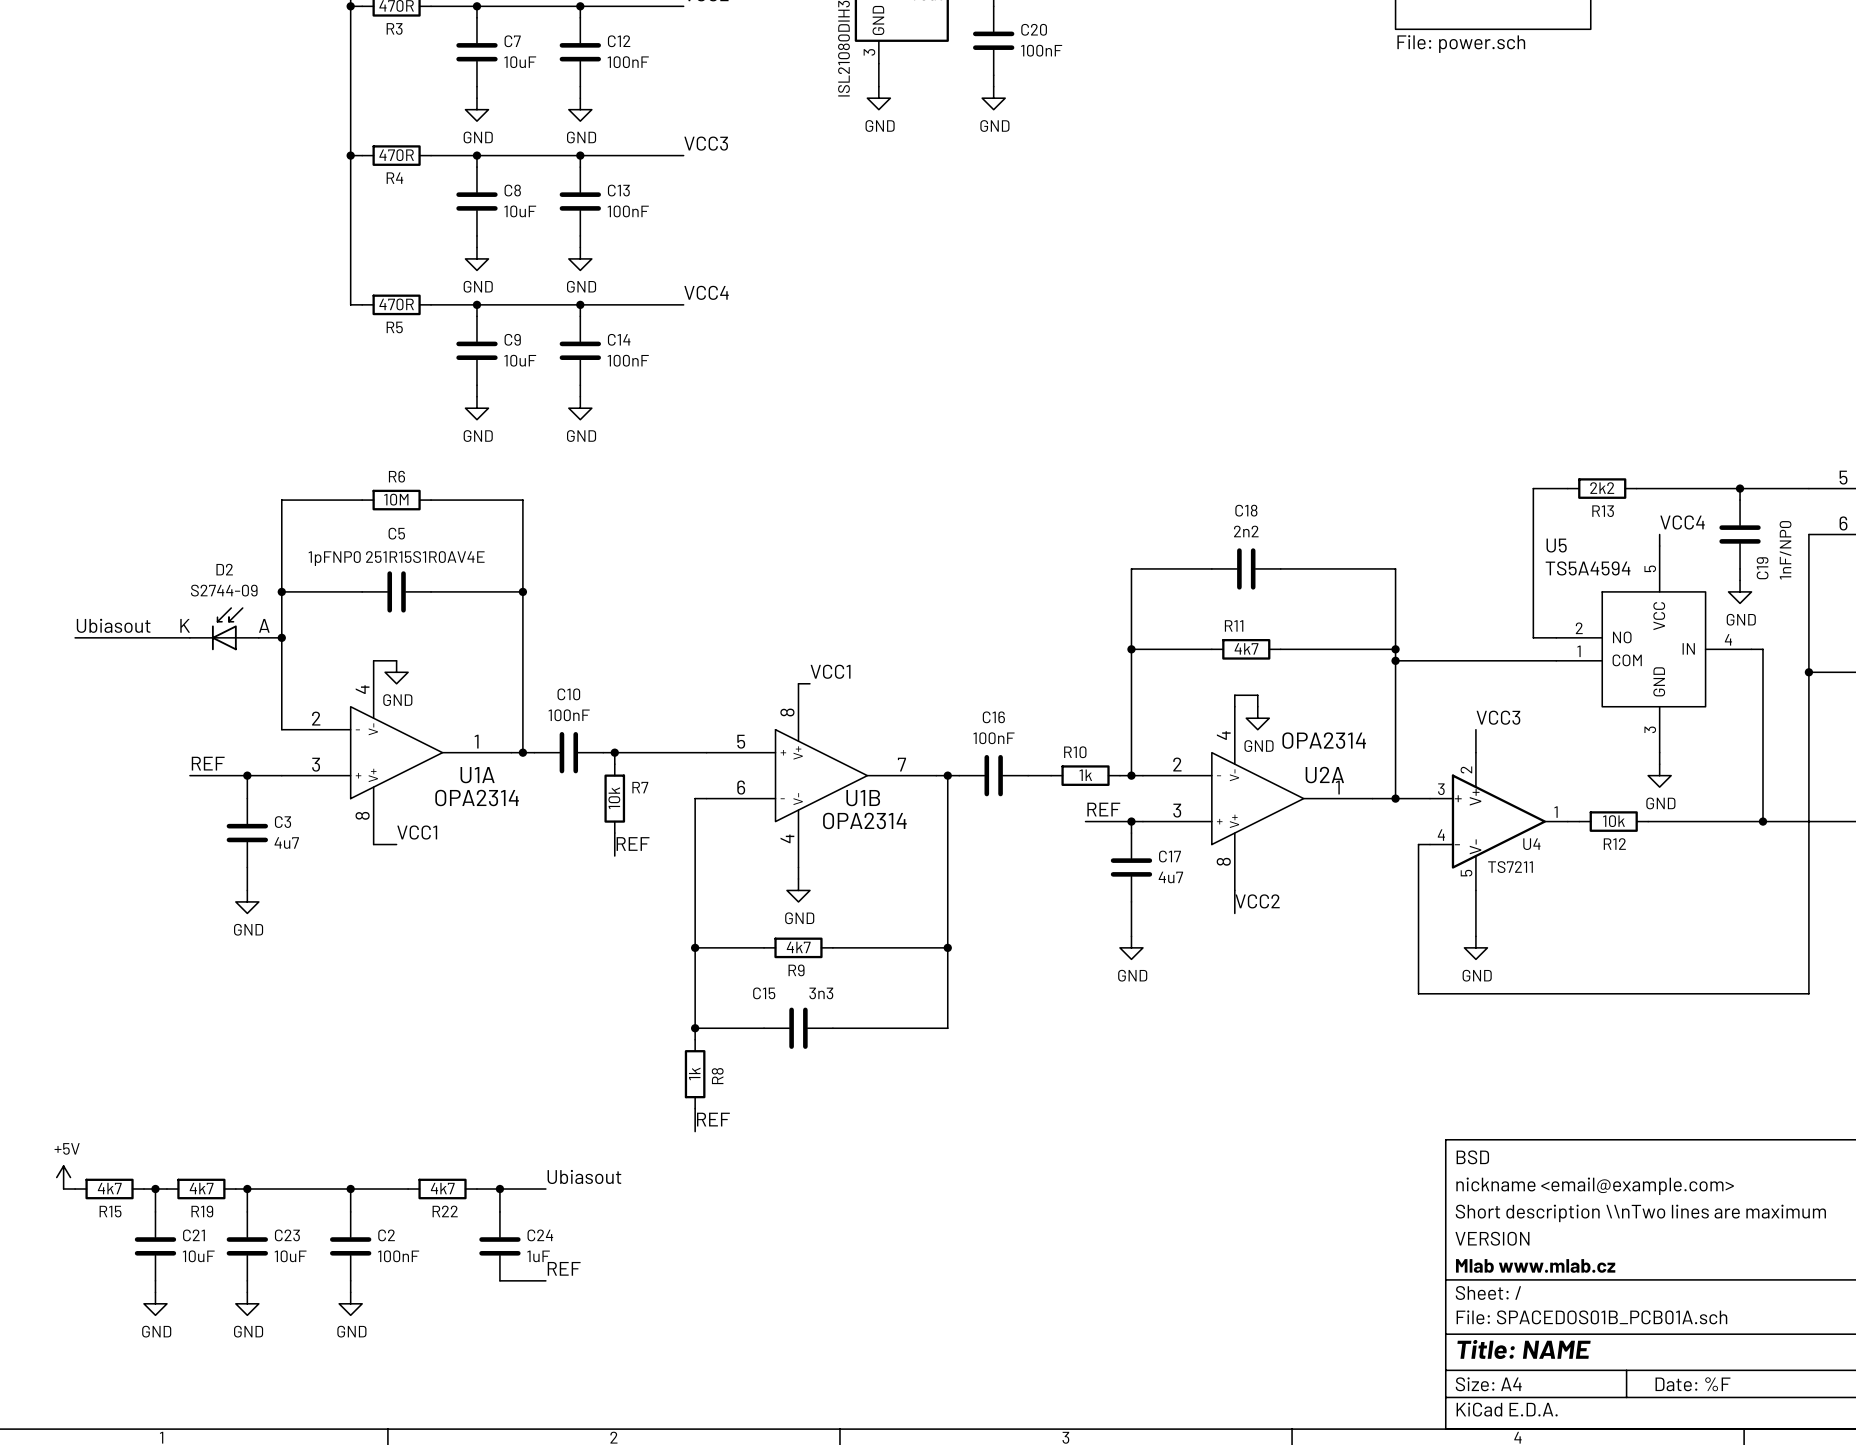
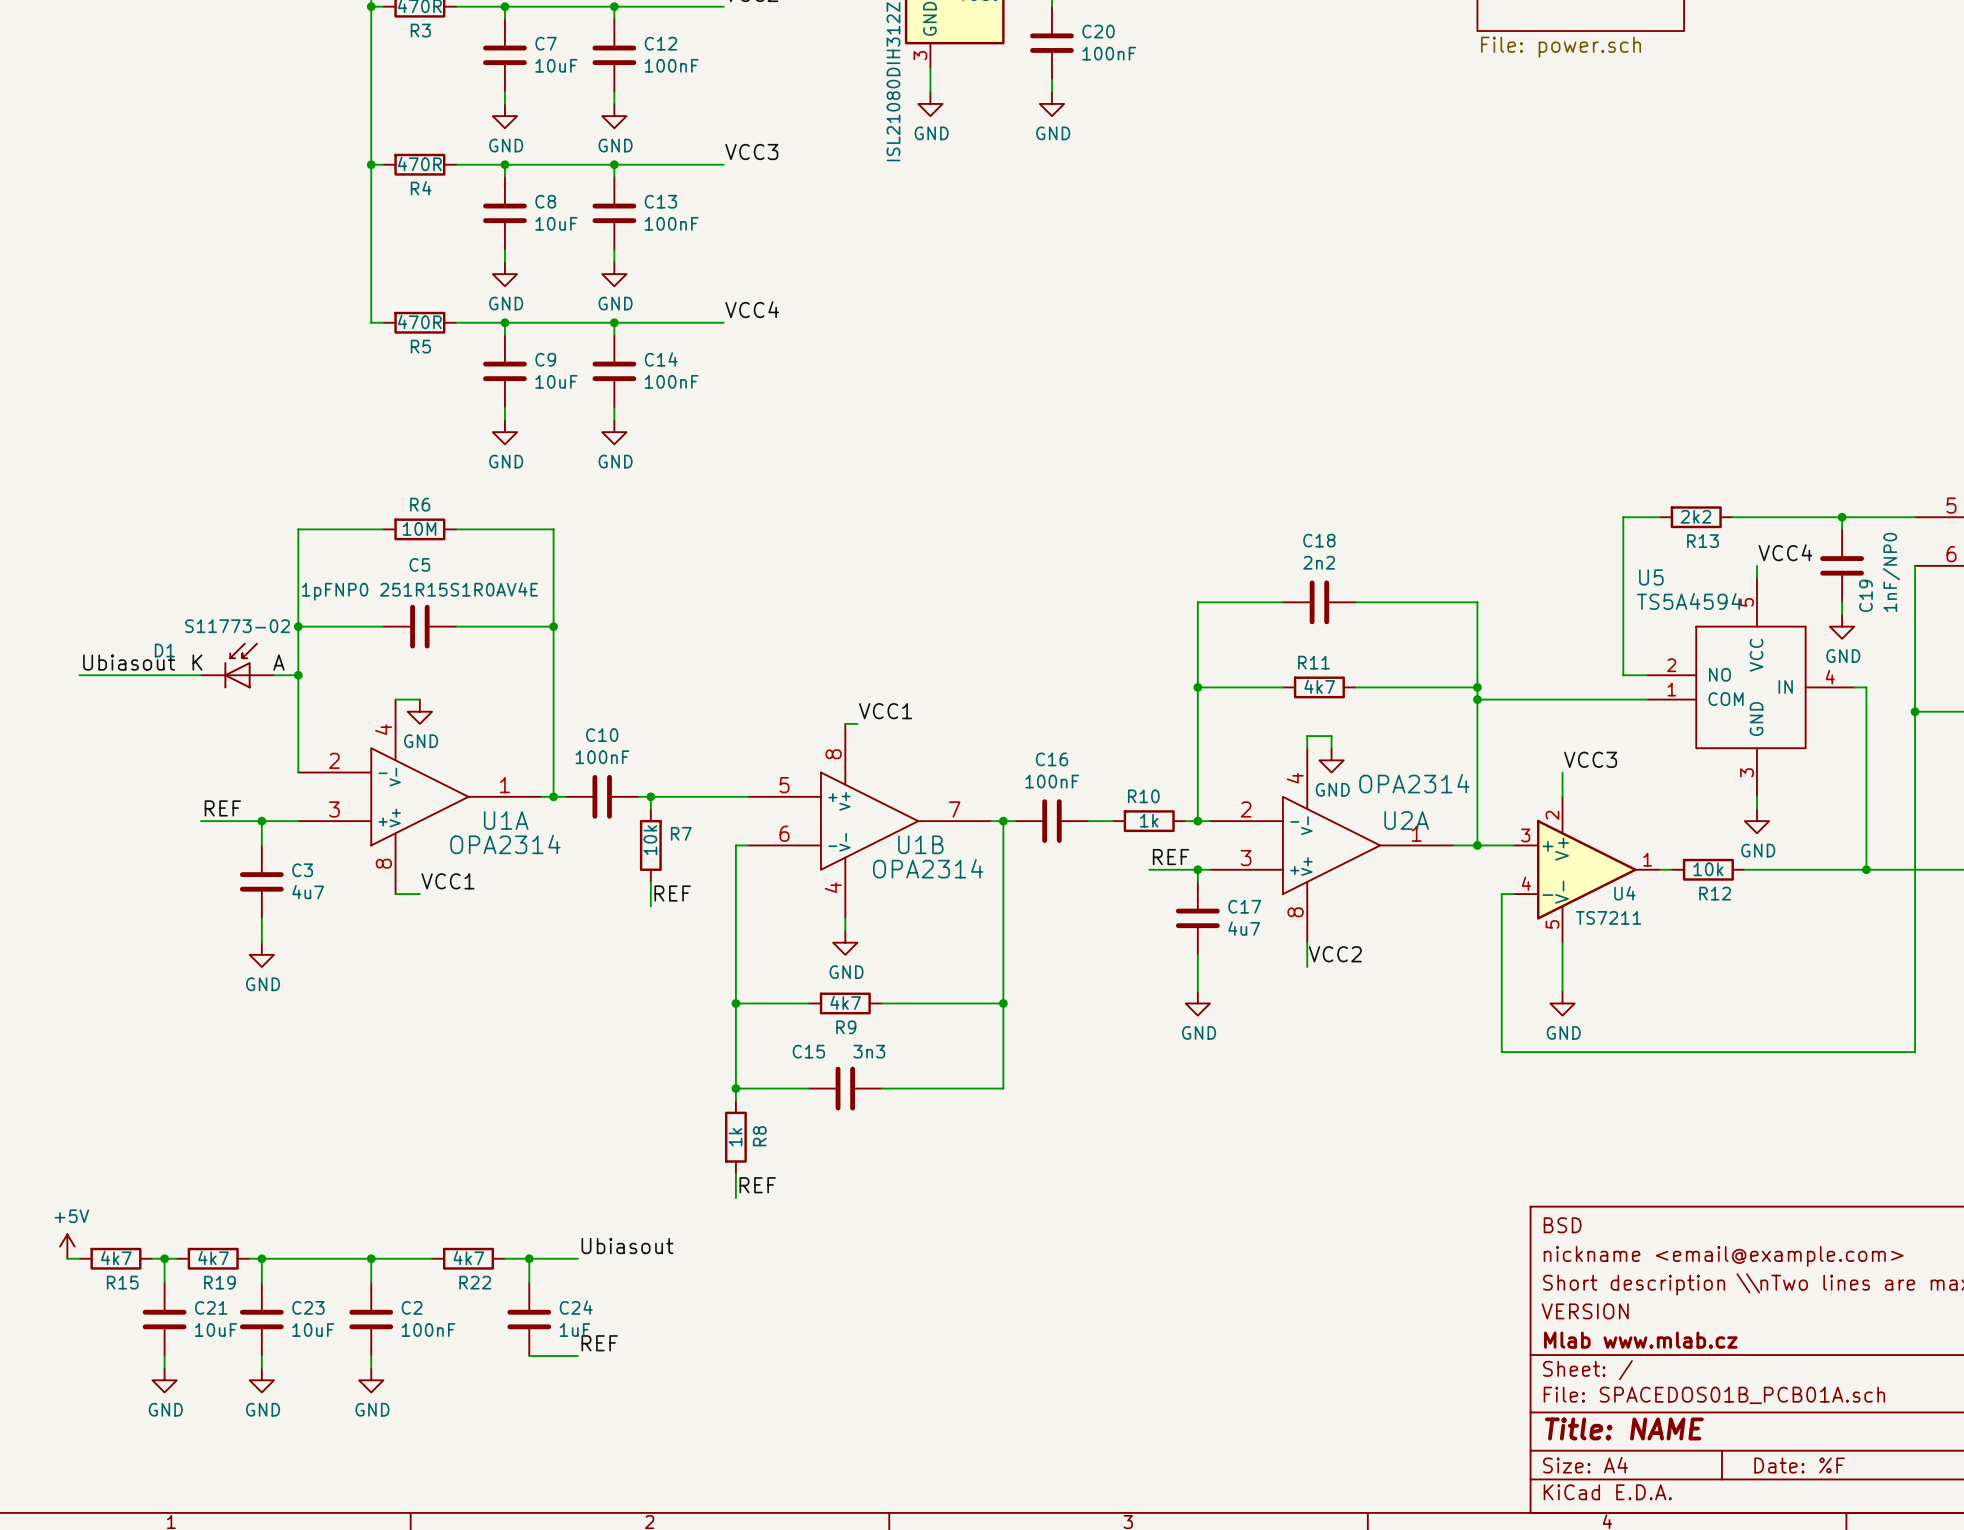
D2 name: D2 (224, 569) -> D1 (164, 650)
D2 value: S2744-09 (224, 590) -> S11773-02 (237, 626)

